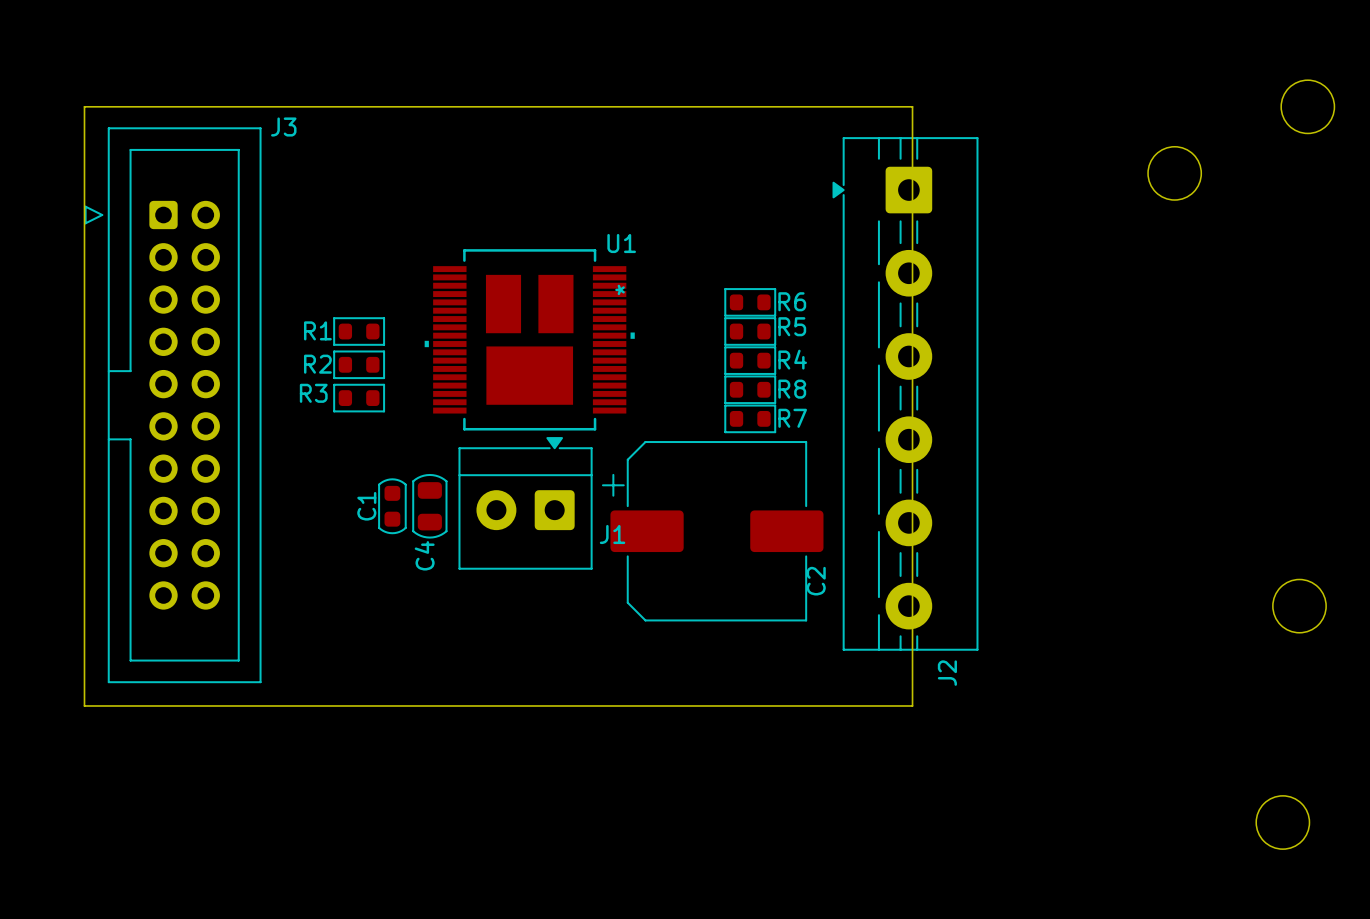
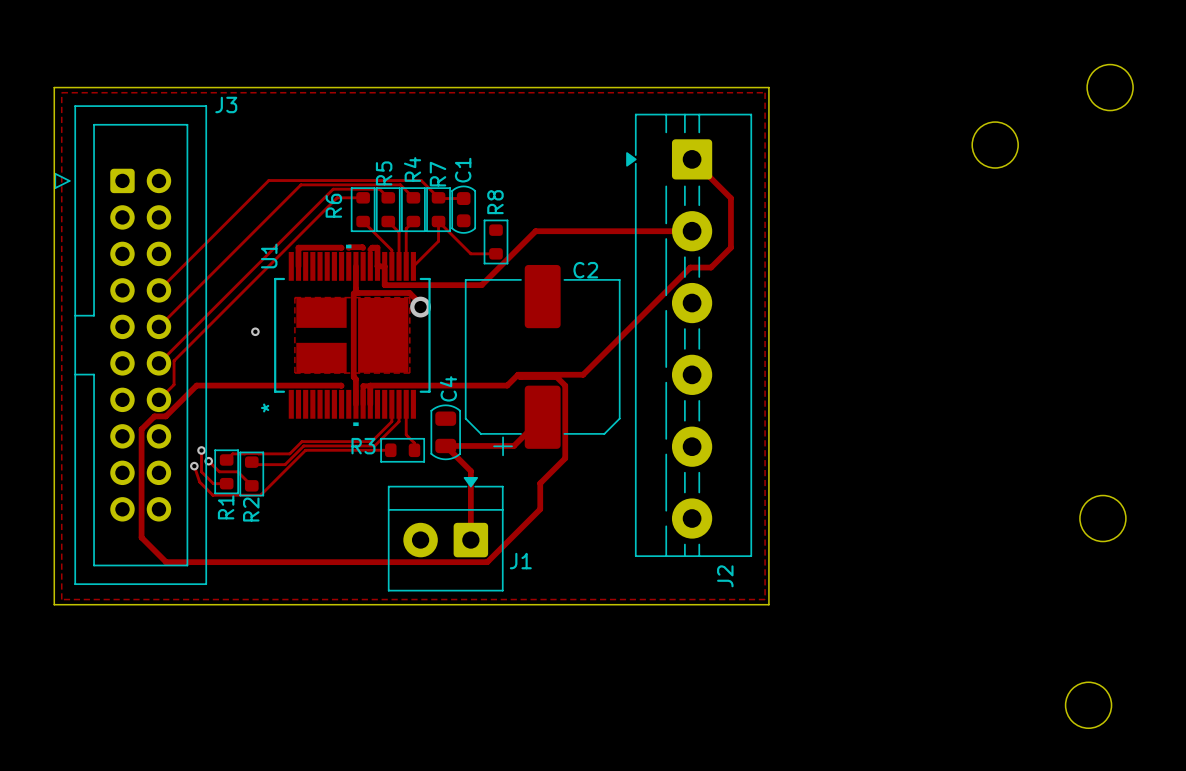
zone outline: none -> (61, 92) (765, 92) (765, 599) (61, 599) (61, 92)
track: none -> (692, 159) (730, 198) (730, 247) (711, 267) (690, 267) (583, 374) (518, 374)
track: none -> (363, 197) (337, 197) (174, 360) (174, 384) (158, 399) (166, 391)
track: none -> (388, 197) (379, 189) (333, 189) (158, 363)
track: none -> (413, 197) (400, 184) (300, 184) (158, 326)
track: none -> (463, 198) (439, 198) (421, 180) (268, 180) (158, 290)
track: none -> (363, 221) (391, 250) (391, 266)
track: none -> (388, 221) (399, 232) (399, 266)
track: none -> (413, 221) (406, 228) (406, 266)
track: none -> (692, 231) (535, 231) (481, 285) (384, 285) (384, 266) (377, 266) (377, 247) (370, 249)
text position: * (620, 289) -> * (265, 407)
track: none -> (341, 247) (298, 247) (298, 266)
track: none -> (348, 247) (363, 247)
track: none -> (496, 253) (470, 253) (438, 221) (438, 241) (413, 266)
R6 name position: R6 (792, 301) -> R6 (333, 205)
R6 rotation: 0° (750, 302) -> 90° clockwise (363, 209)
R6 position: (750, 302) -> (363, 209)
track: none -> (355, 266) (355, 291)
R5 name position: R5 (792, 326) -> R5 (384, 173)
R1 name position: R1 (317, 330) -> R1 (226, 507)
R1 rotation: 0° (359, 331) -> 90° clockwise (226, 471)
R1 position: (359, 331) -> (226, 471)
R5 rotation: 0° (750, 331) -> 90° clockwise (388, 209)
R5 position: (750, 331) -> (388, 209)
U1 rotation: 0° (529, 339) -> 90° counterclockwise (352, 335)
track: none -> (355, 291) (353, 293) (353, 377) (355, 379) (355, 404)
track: none -> (355, 291) (357, 292) (409, 292) (420, 303) (420, 307)
zone outline: none -> (294, 297) (409, 297) (409, 373) (294, 373) (294, 297)
R4 name position: R4 (792, 359) -> R4 (412, 169)
R4 rotation: 0° (750, 360) -> 90° clockwise (413, 209)
R4 position: (750, 360) -> (413, 209)
via: none -> (420, 307)
R2 name position: R2 (317, 364) -> R2 (251, 509)
R2 rotation: 0° (359, 364) -> 90° clockwise (251, 473)
R2 position: (359, 364) -> (251, 473)
via: none -> (255, 331)
R8 rotation: 0° (750, 389) -> 90° clockwise (496, 241)
R8 position: (750, 389) -> (496, 241)
R8 name position: R8 (792, 389) -> R8 (495, 202)
J2 position: (905, 393) -> (689, 335)
R3 position: (359, 398) -> (402, 450)
R7 rotation: 0° (750, 418) -> 90° clockwise (438, 209)
R7 position: (750, 418) -> (438, 209)
R7 name position: R7 (792, 418) -> R7 (438, 174)
track: none -> (518, 374) (520, 377) (556, 377) (565, 385) (565, 458) (540, 483) (540, 509) (487, 562) (166, 562) (141, 537) (141, 429) (154, 416) (165, 416) (196, 385) (341, 385)
track: none -> (518, 374) (507, 385) (370, 385) (370, 404) (370, 385) (363, 385) (363, 404)
track: none -> (391, 404) (391, 421) (371, 441) (302, 441) (289, 453) (232, 453) (226, 459)
track: none -> (399, 404) (399, 421) (374, 445) (303, 445) (285, 464) (254, 464) (251, 462)
track: none -> (406, 404) (406, 434) (414, 443) (414, 450)
track: none -> (542, 417) (513, 445) (445, 445) (470, 471) (470, 540)
J1 position: (525, 503) -> (445, 534)
C1 name position: C1 (366, 506) -> C1 (463, 170)
C1 position: (392, 506) -> (463, 209)
C4 position: (429, 506) -> (445, 432)
track: none -> (201, 450) (201, 471) (213, 483) (226, 483)
via: none -> (201, 450)
track: none -> (390, 450) (305, 450) (260, 495) (212, 495) (199, 481) (194, 466)
C2 rotation: 0° (712, 531) -> 90° counterclockwise (542, 360)
track: none -> (208, 461) (219, 471) (237, 471) (251, 485)
via: none -> (208, 461)
via: none -> (194, 466)
C4 name position: C4 (424, 555) -> C4 (448, 388)

